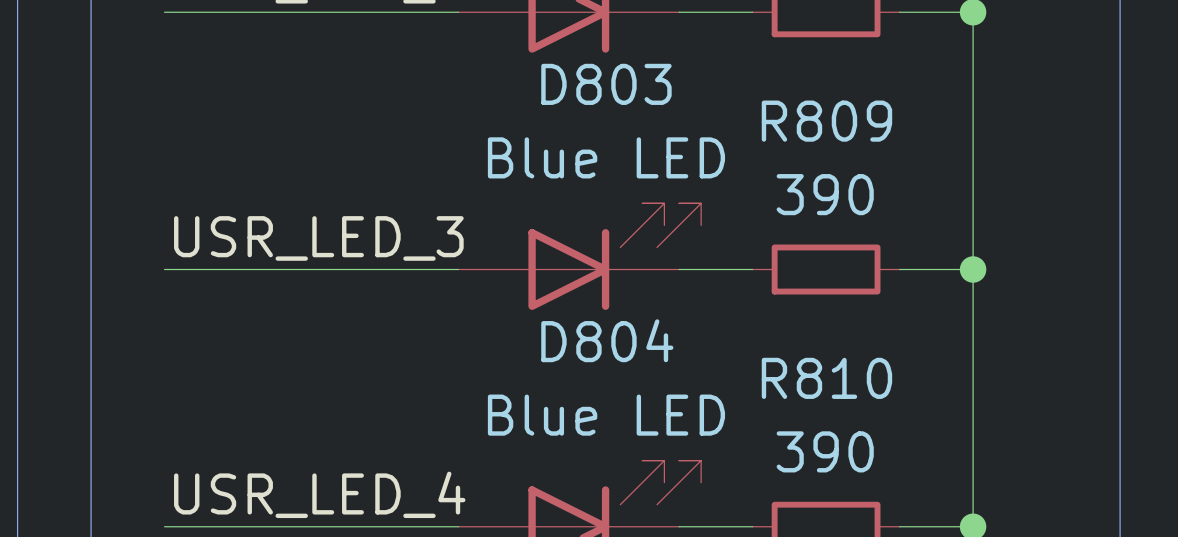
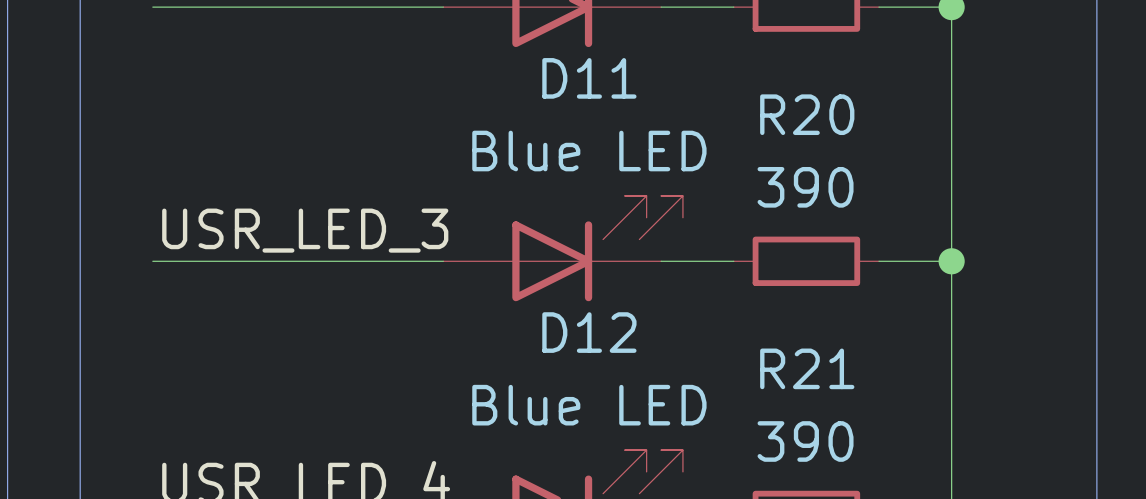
D803 name: D803 (606, 84) -> D11 (589, 78)
R809 name: R809 (826, 121) -> R20 (807, 114)
D804 name: D804 (607, 340) -> D12 (589, 332)
R810 name: R810 (826, 378) -> R21 (807, 368)

